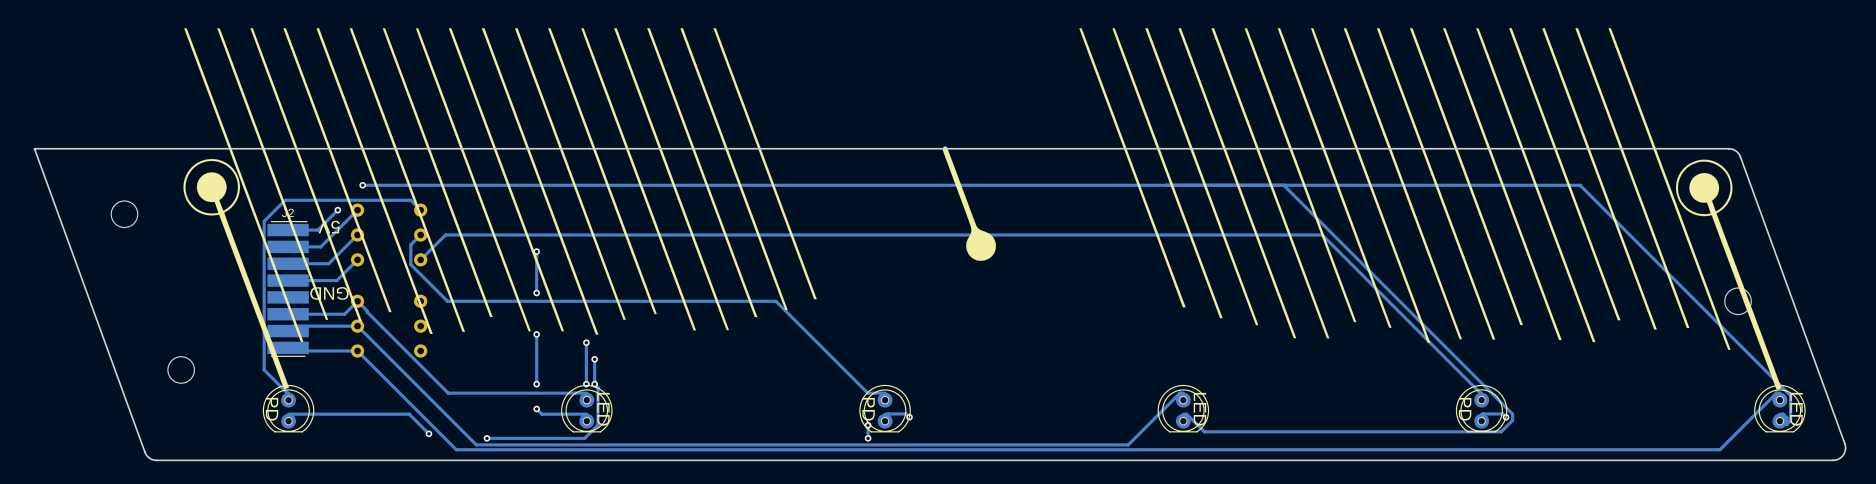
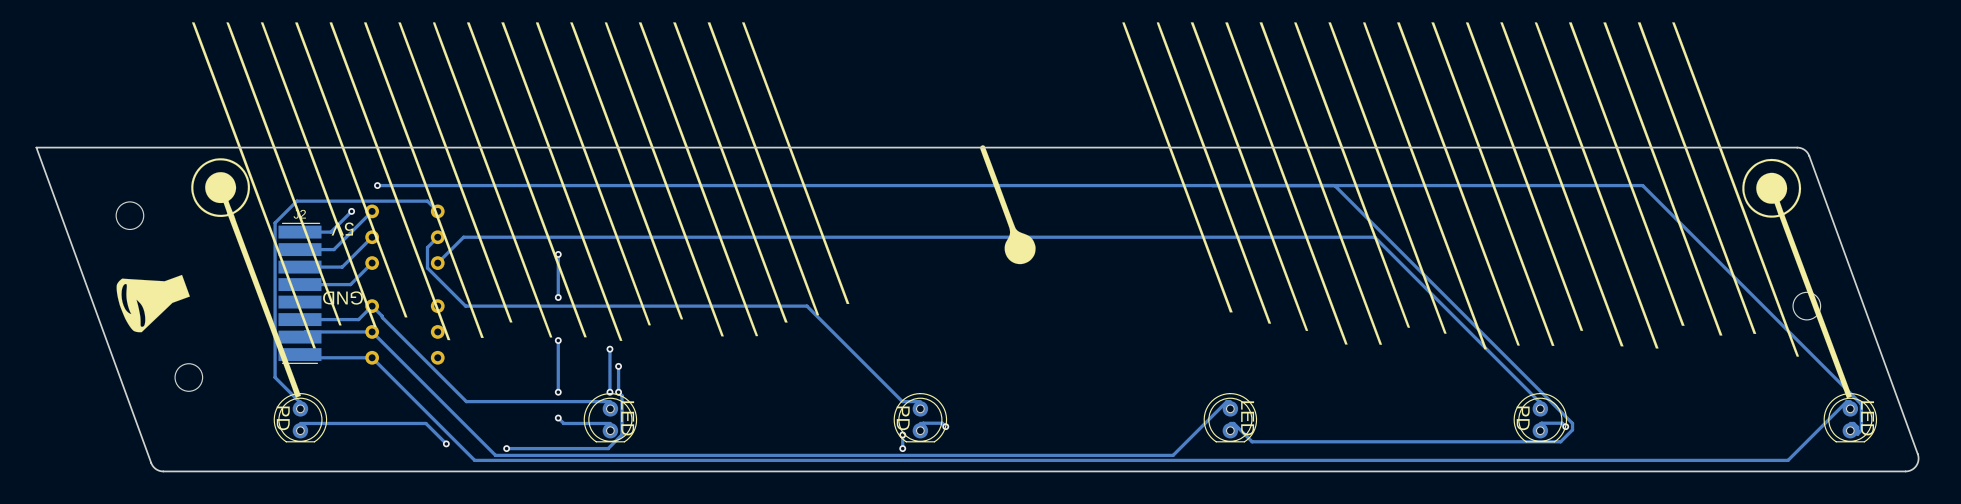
drawing: none -> [116, 274, 190, 333]

